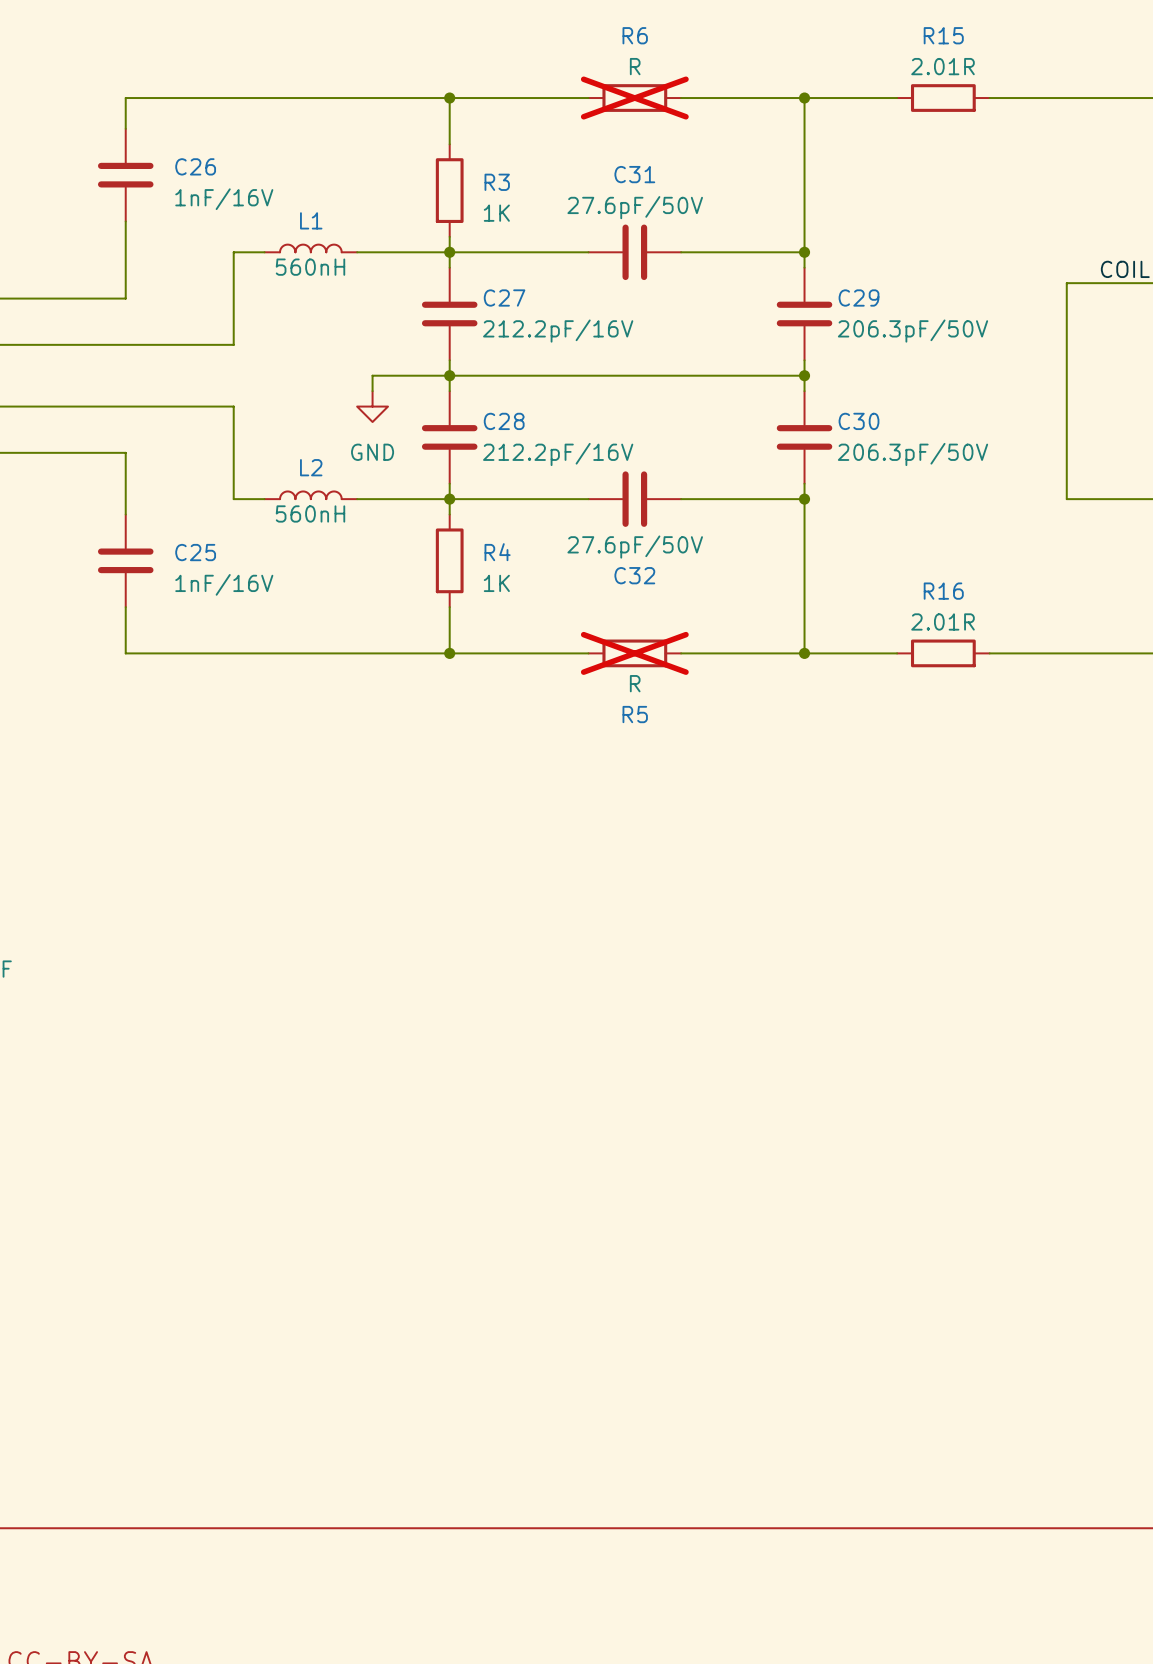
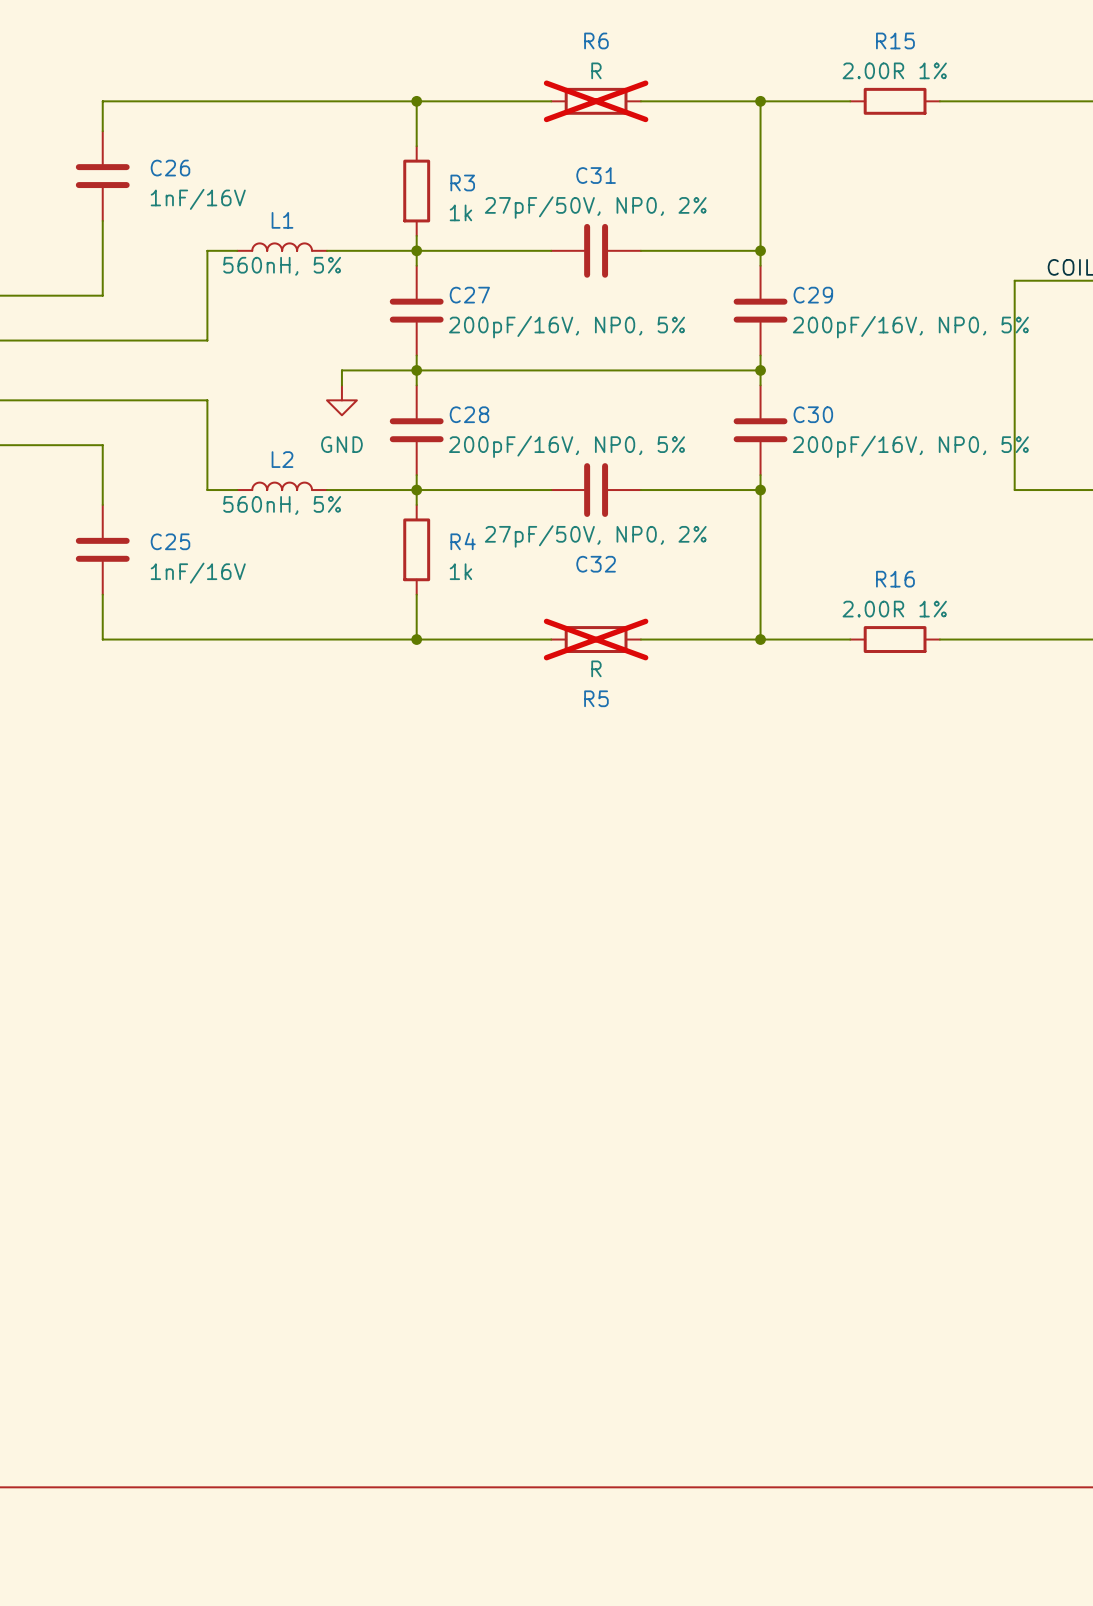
R15 value: 2.01R (943, 66) -> 2.00R 1% (894, 70)
C31 value: 27.6pF/50V (635, 207) -> 27pF/50V, NP0, 2% (595, 207)
R3 value: 1K (496, 213) -> 1k (460, 212)
L1 value: 560nH (310, 267) -> 560nH, 5% (282, 266)
C27 value: 212.2pF/16V (558, 331) -> 200pF/16V, NP0, 5% (567, 327)
C29 value: 206.3pF/50V (913, 331) -> 200pF/16V, NP0, 5% (910, 327)
C28 value: 212.2pF/16V (558, 454) -> 200pF/16V, NP0, 5% (567, 446)
C30 value: 206.3pF/50V (913, 454) -> 200pF/16V, NP0, 5% (910, 446)
L2 value: 560nH (310, 513) -> 560nH, 5% (282, 505)
C32 value: 27.6pF/50V (635, 547) -> 27pF/50V, NP0, 2% (595, 536)
R4 value: 1K (496, 583) -> 1k (460, 571)
R16 value: 2.01R (943, 621) -> 2.00R 1% (894, 609)

